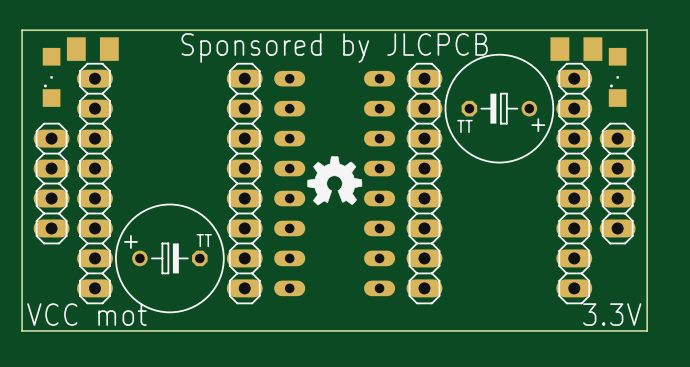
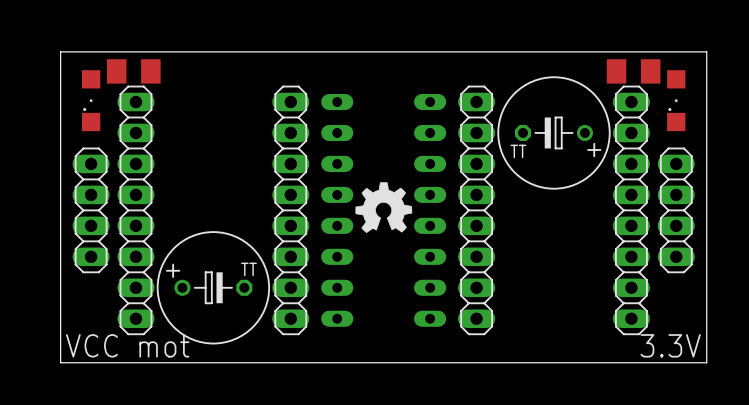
text: Sponsored by JLCPCB (334, 48) -> none

